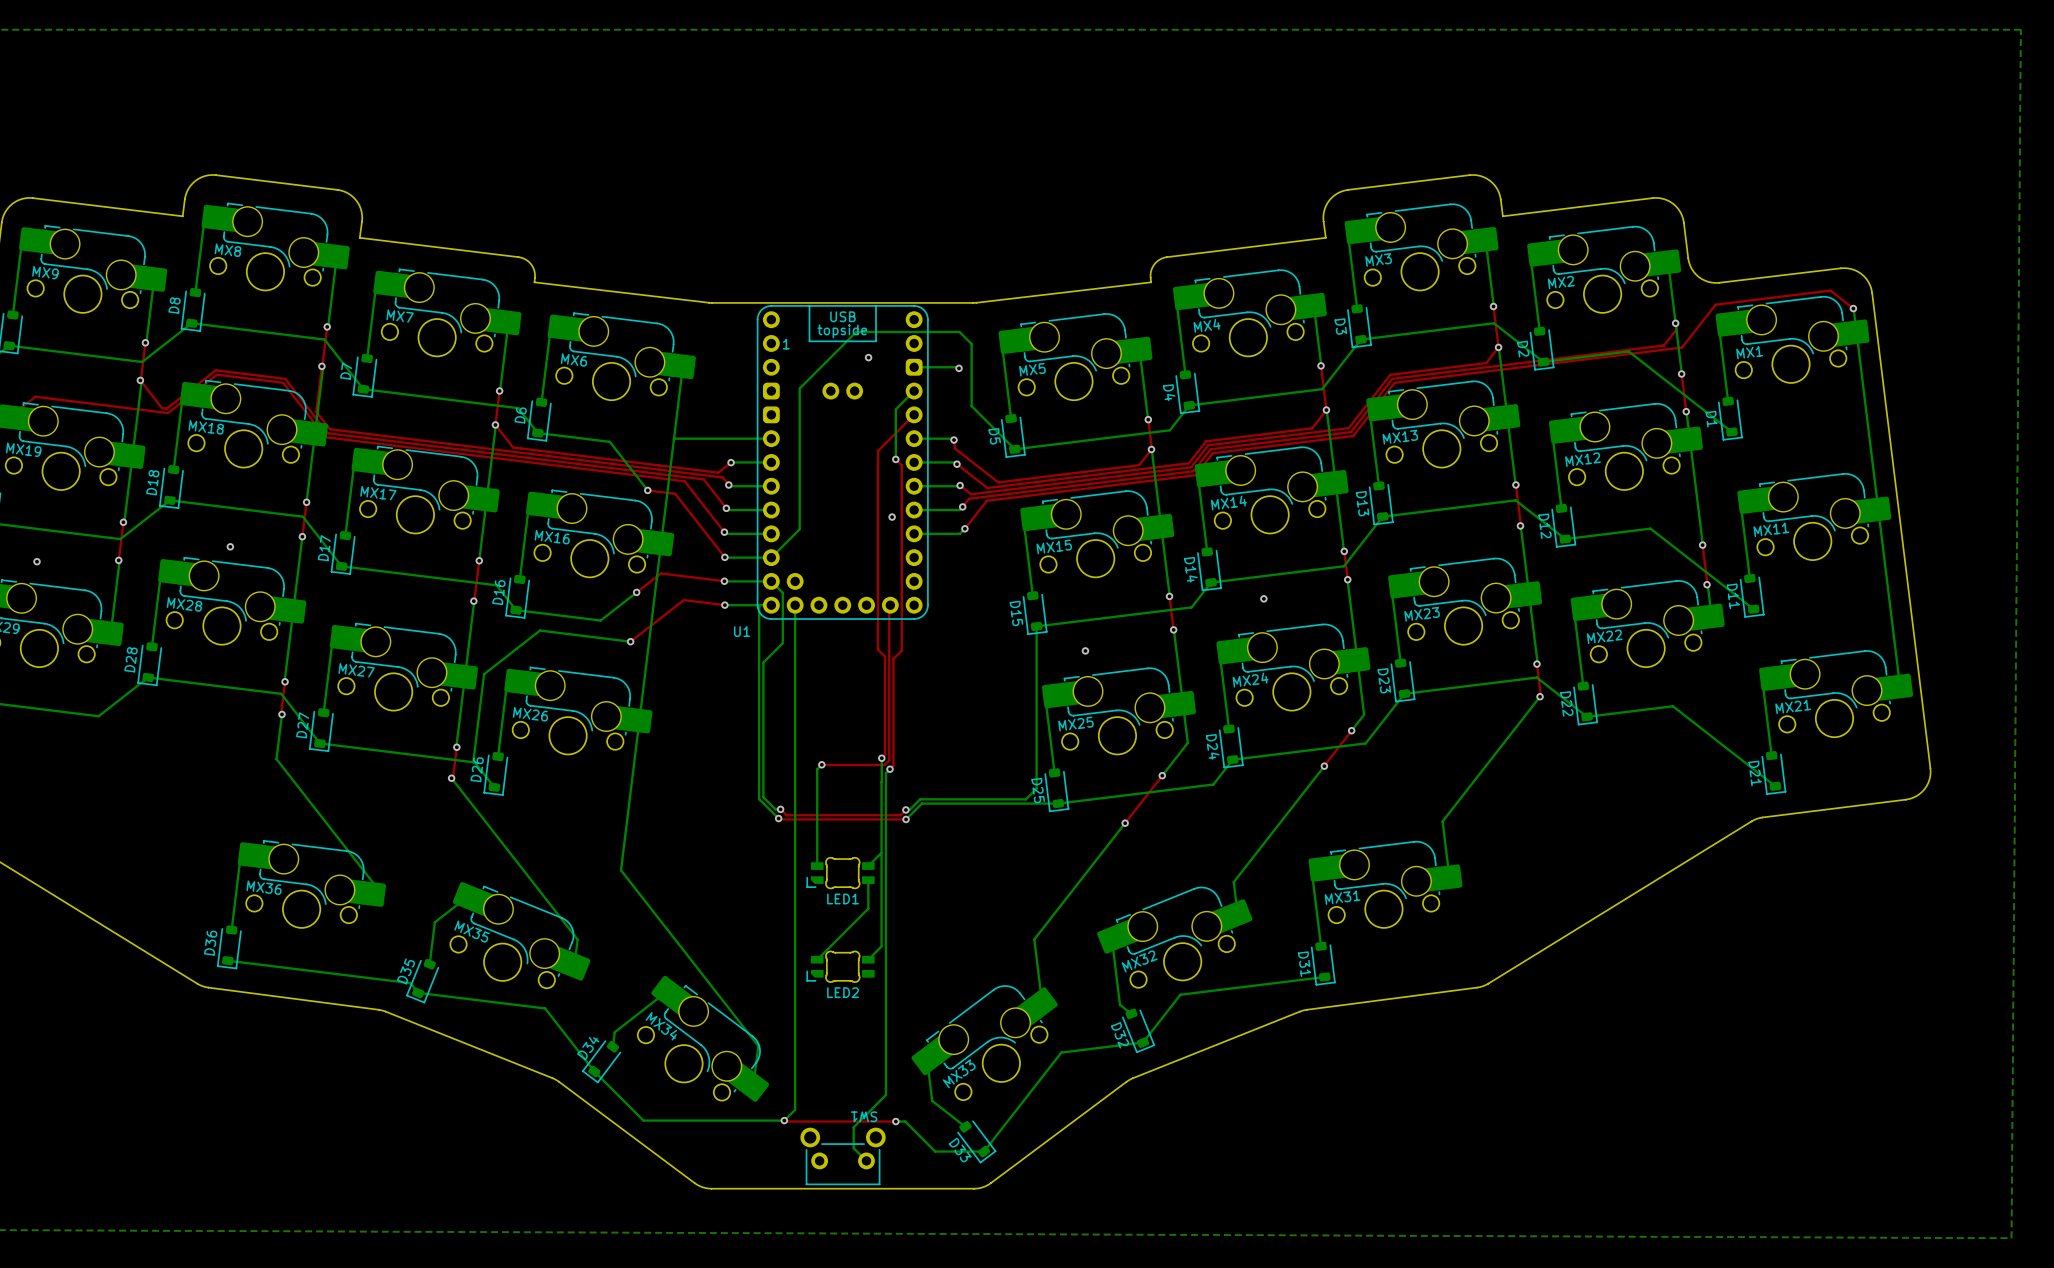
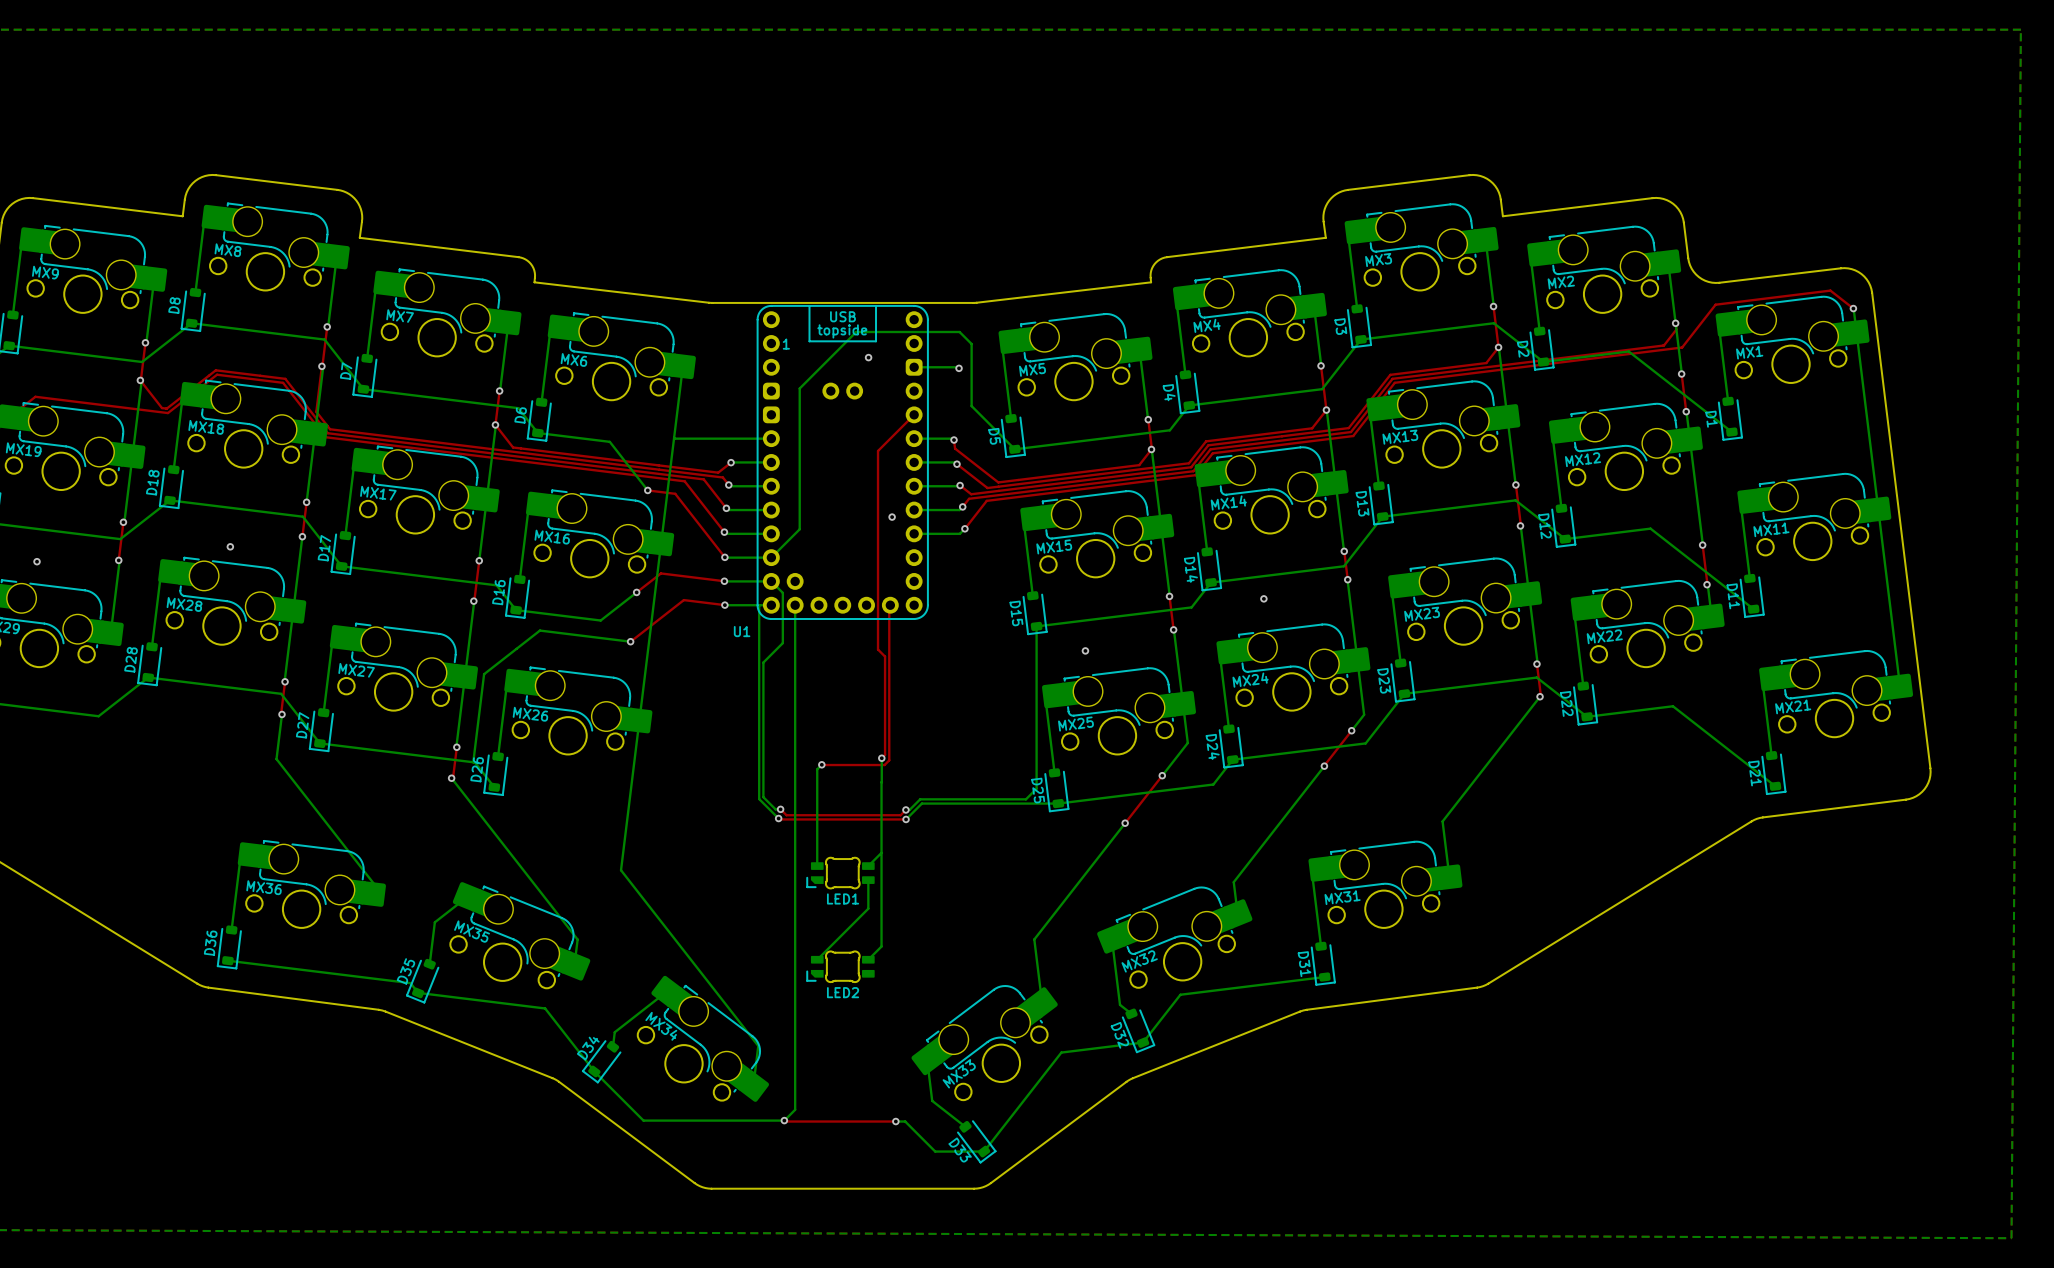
bottom track: (914, 391) (895, 409) (895, 459) -> none
top track: (895, 459) (901, 465) (901, 650) (893, 658) (893, 765) (890, 769) -> none
via: (895, 459) -> none
bottom track: (890, 769) (885, 773) (885, 1095) (853, 1127) (853, 1148) (866, 1160) -> none
via: (890, 769) -> none
SW1: (843, 1156) -> none

